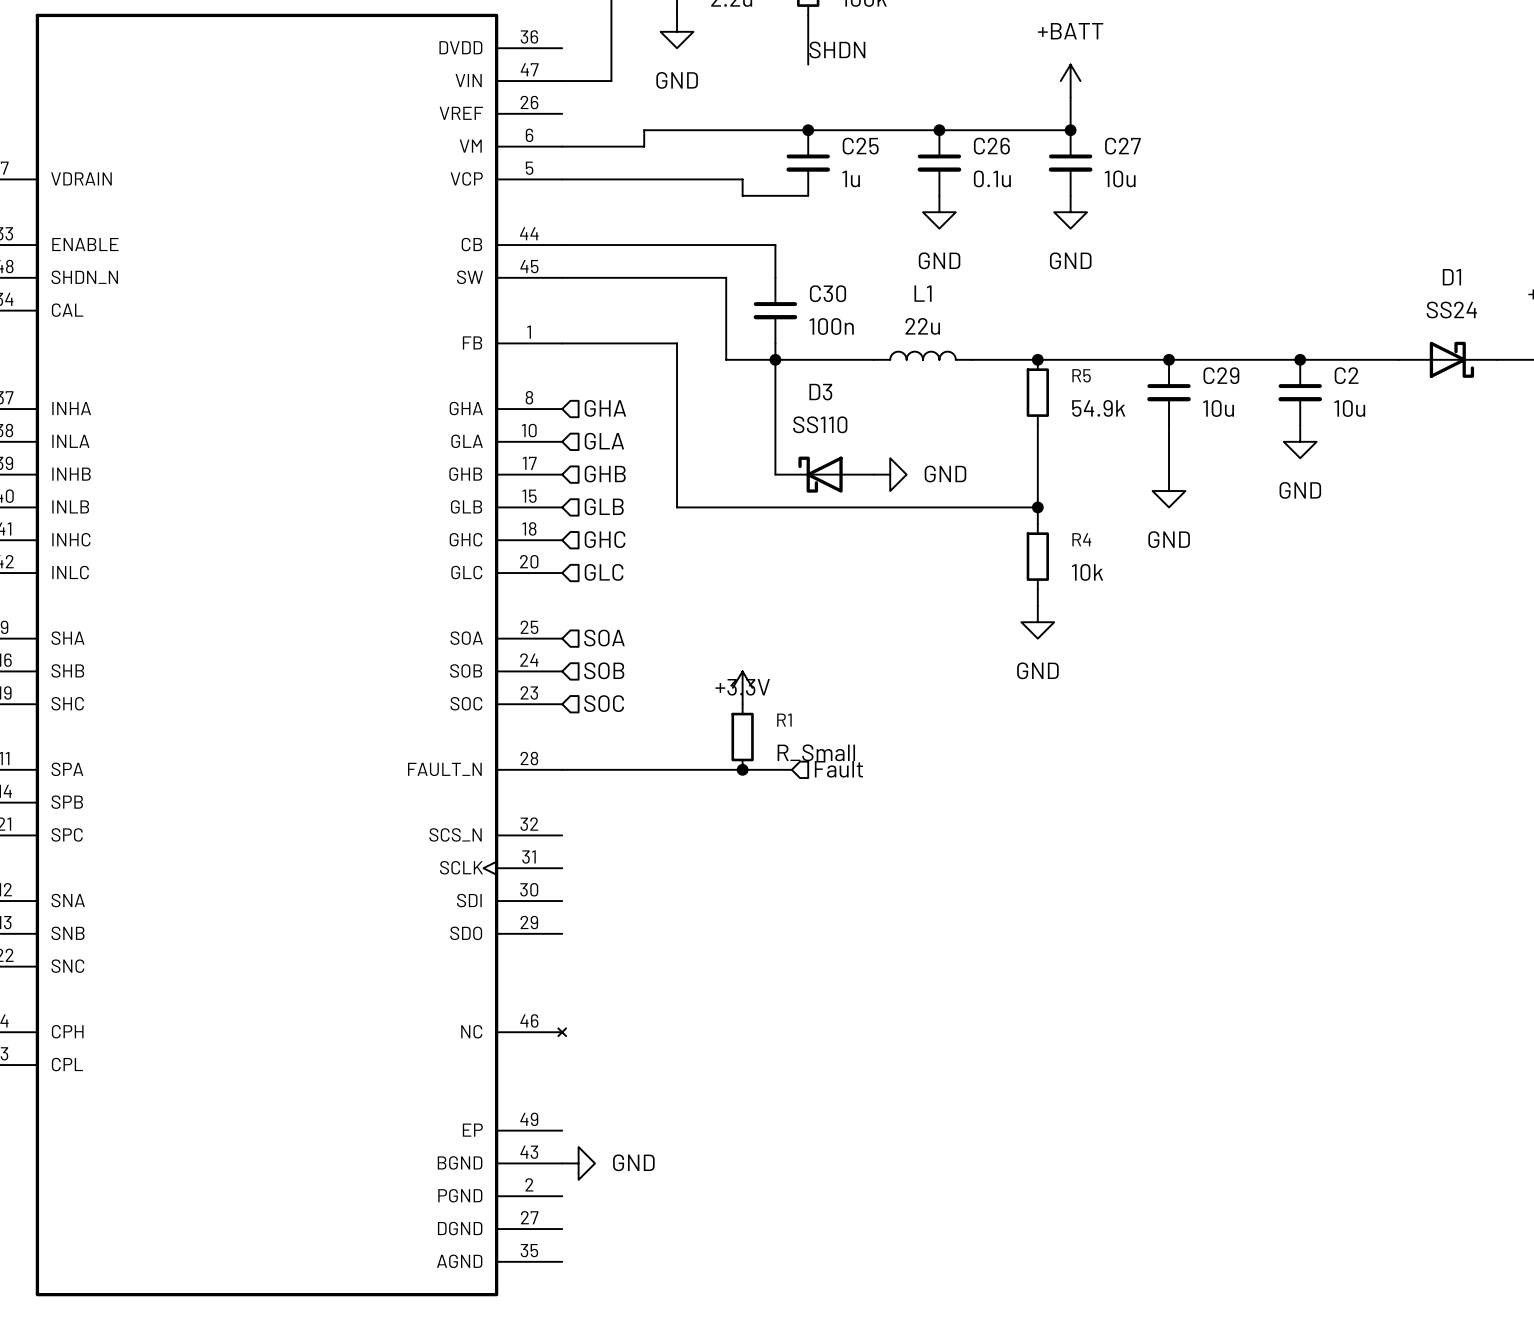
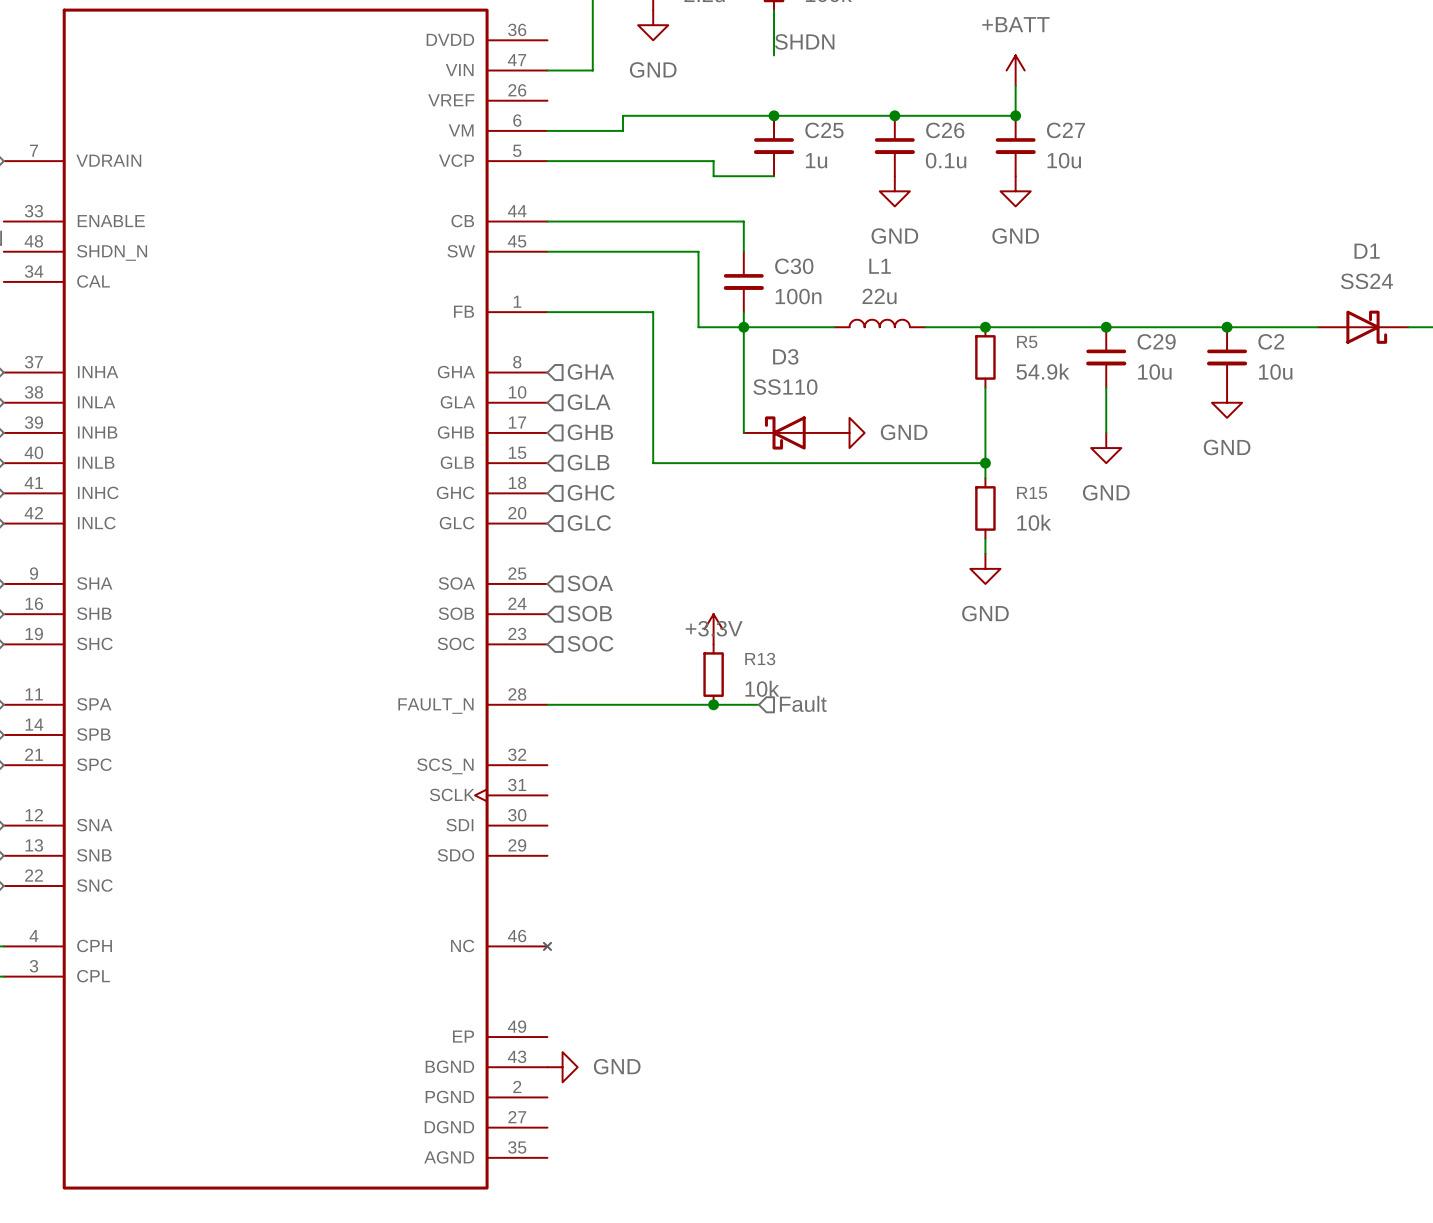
R4 name: R4 (1081, 539) -> R15 (1032, 492)
R1 name: R1 (784, 720) -> R13 (760, 659)
R1 value: R_Small (816, 752) -> 10k (762, 688)

